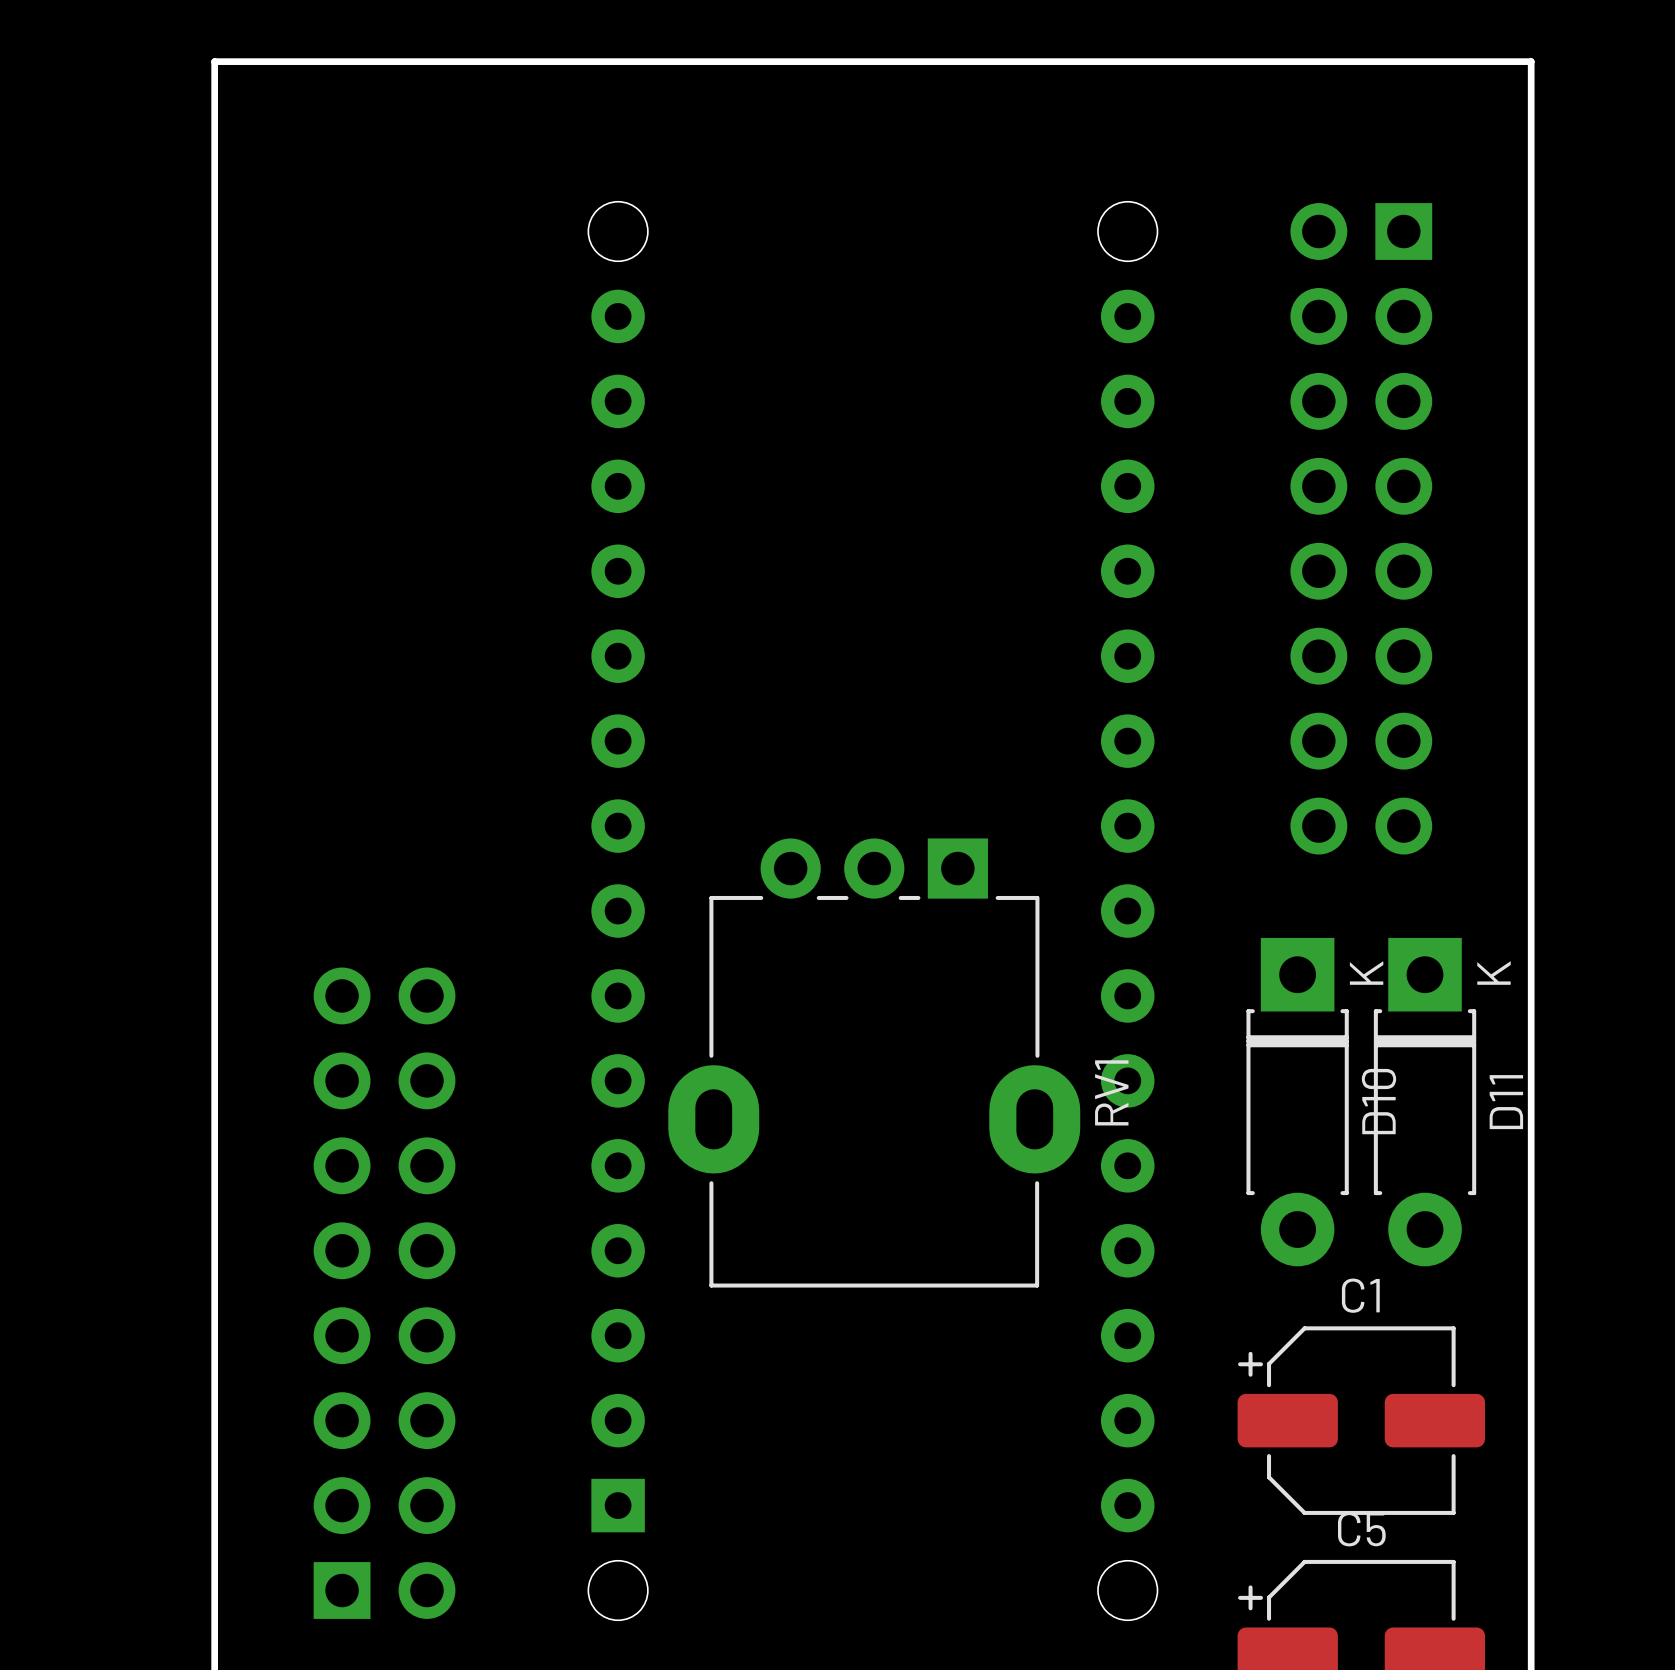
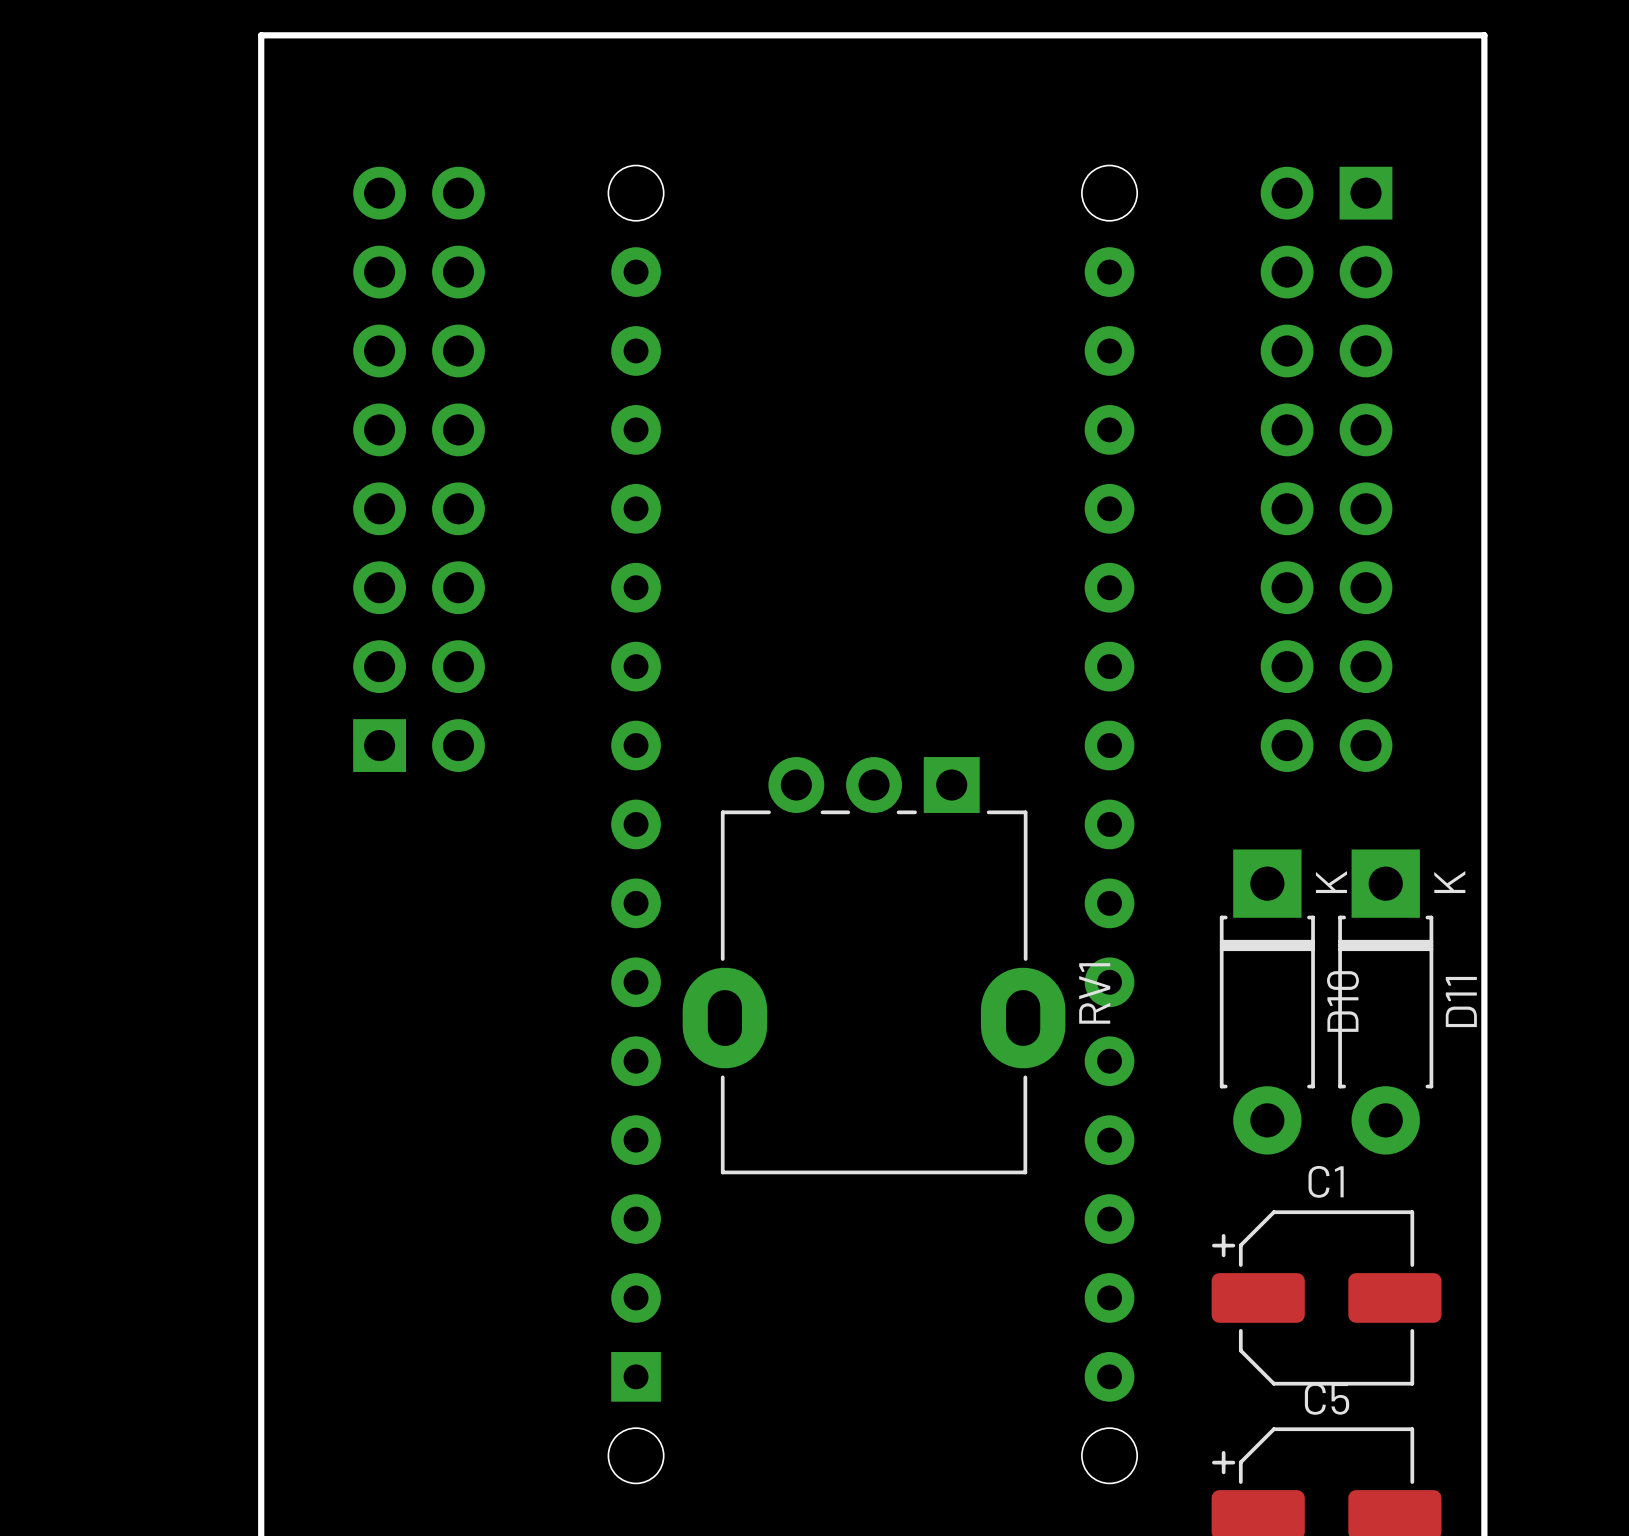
part position: (384, 1293) -> (419, 469)

